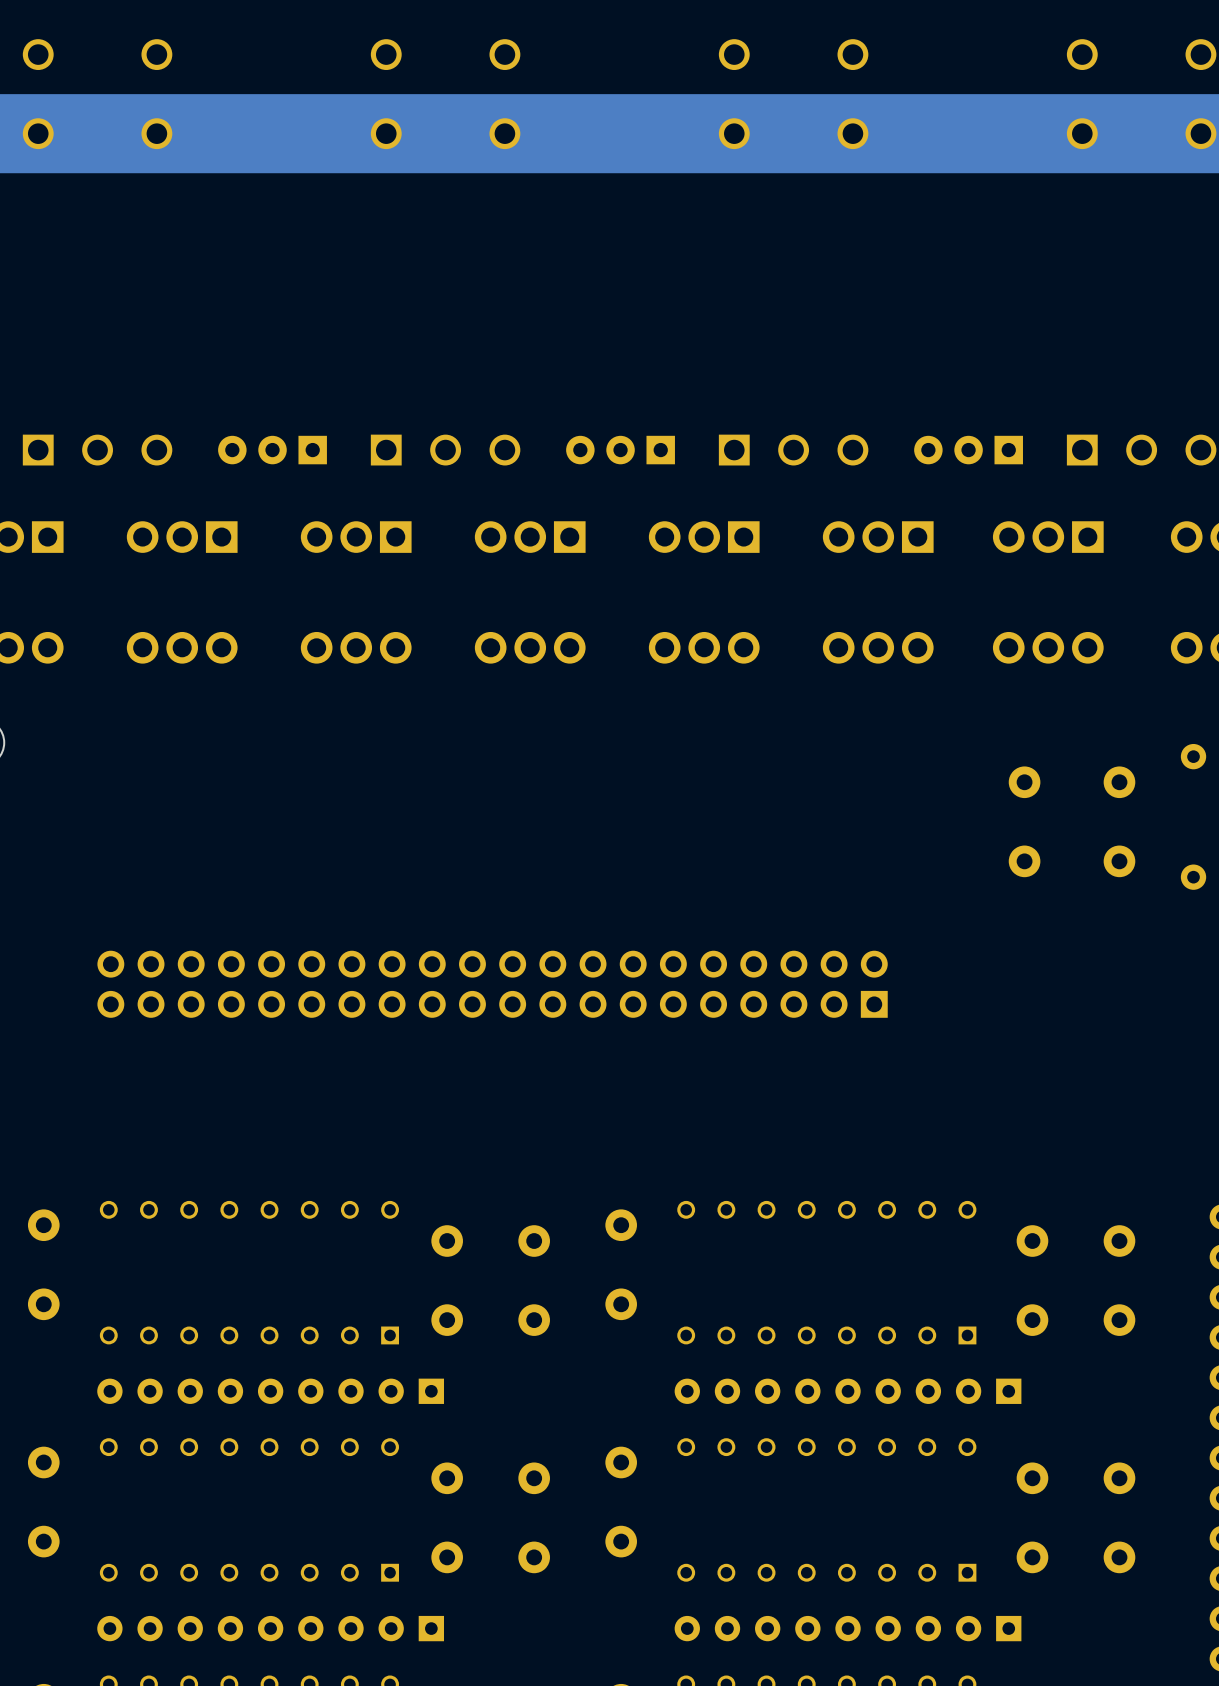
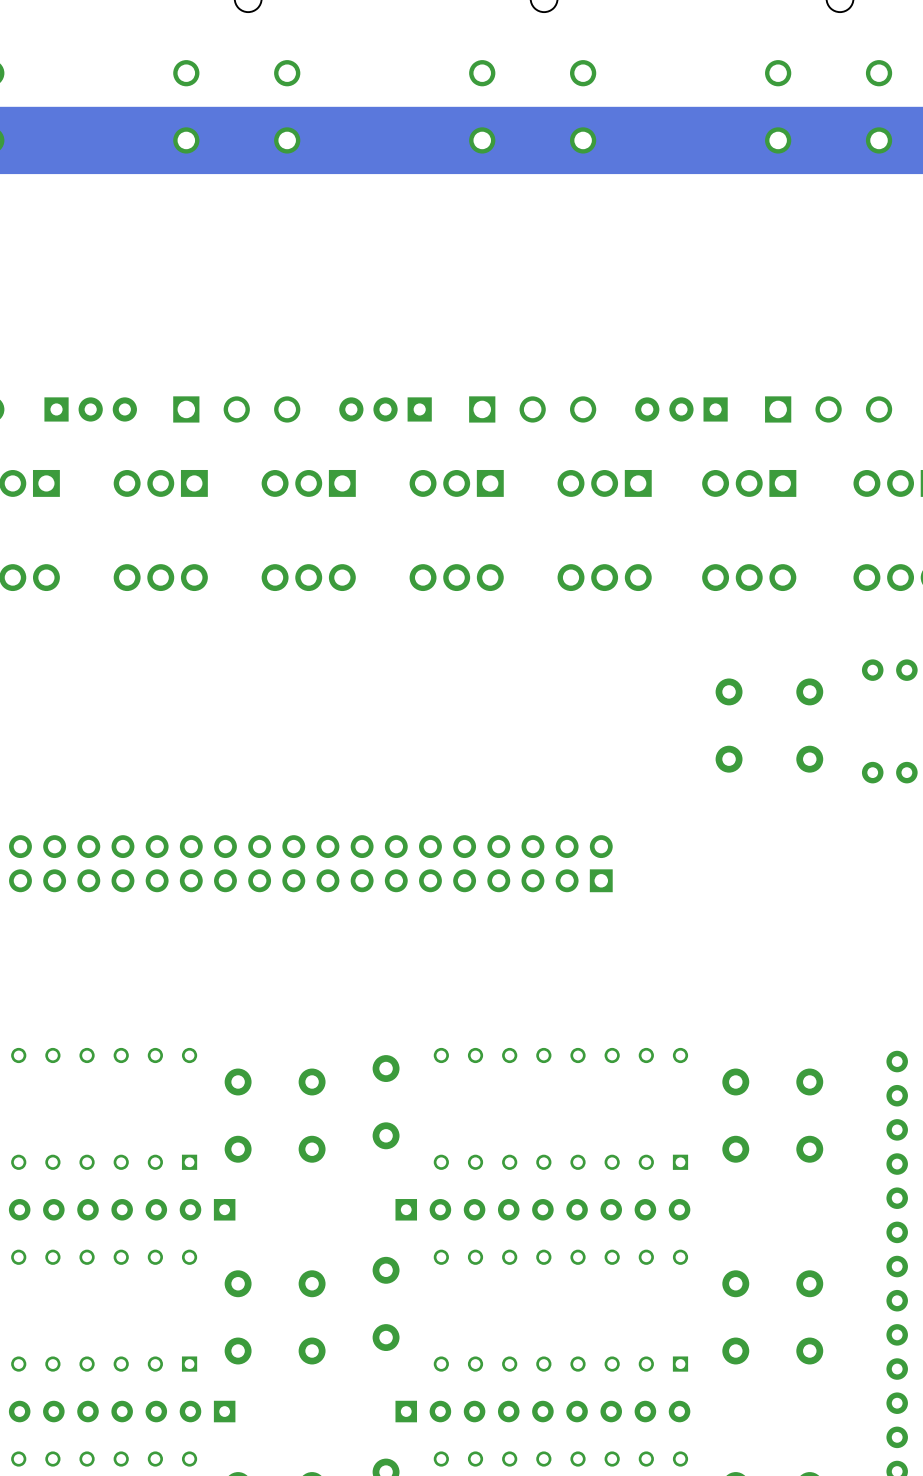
part rotation: 0° (272, 450) -> 180° (90, 409)
part rotation: 0° (848, 1391) -> 180° (542, 1209)
part rotation: 0° (848, 1628) -> 180° (542, 1411)

